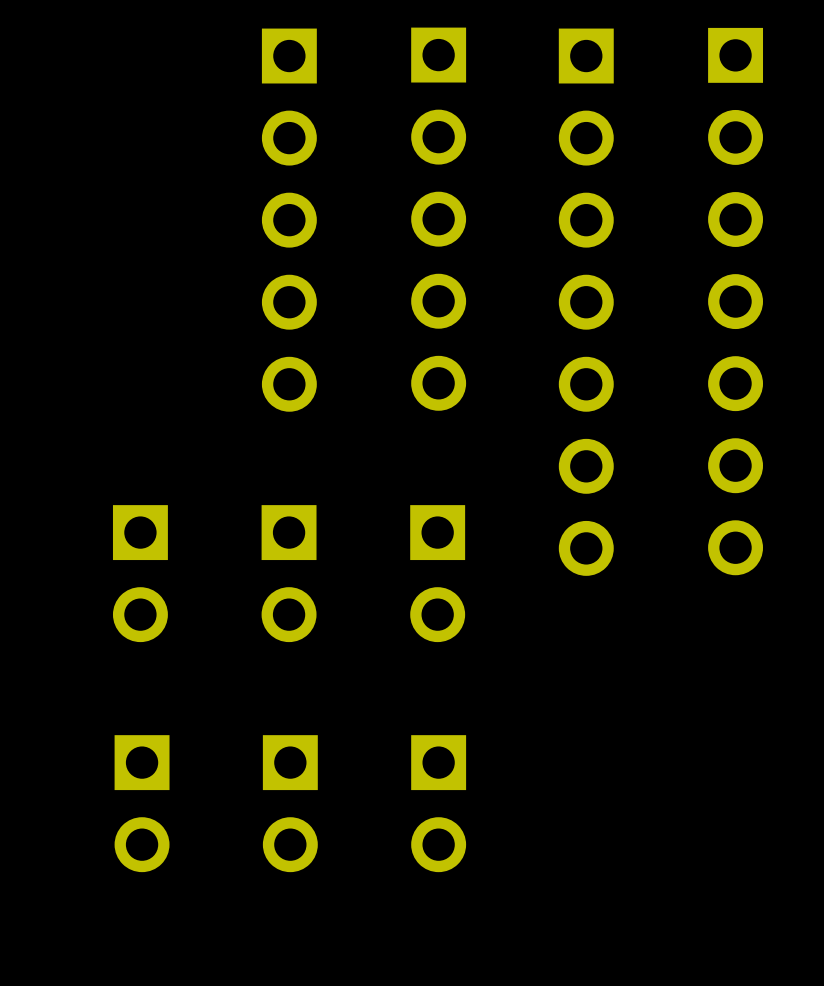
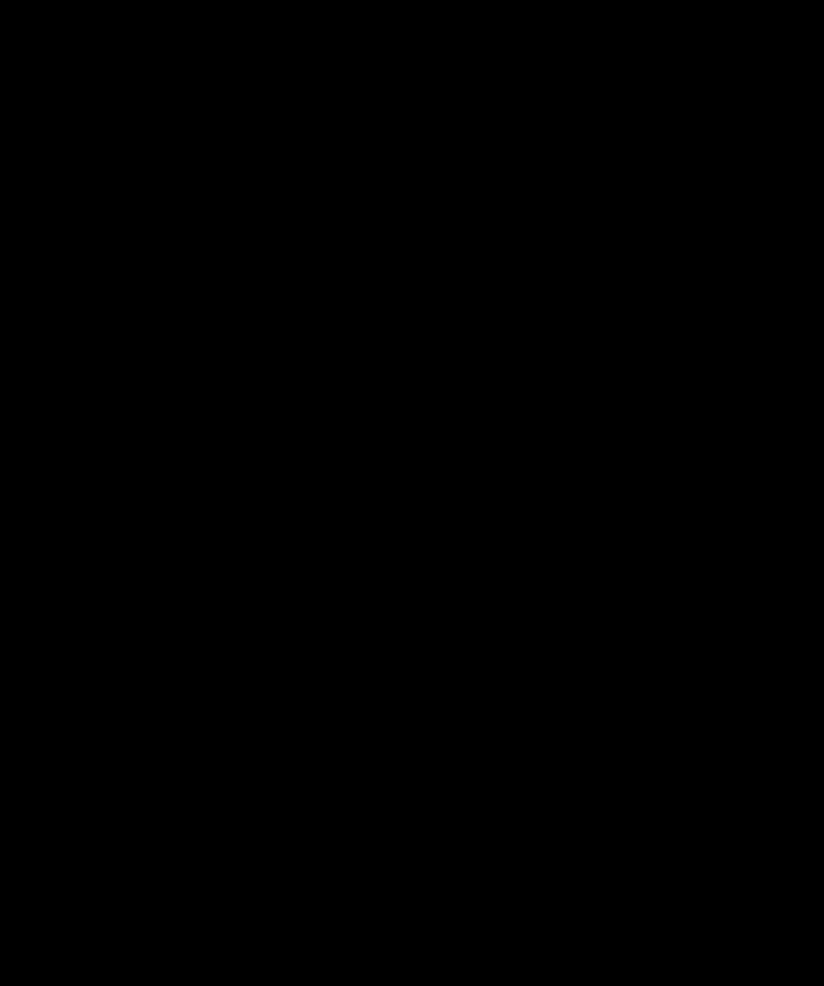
part: (438, 219) -> none
part: (289, 220) -> none
part: (735, 301) -> none
part: (586, 302) -> none
part: (140, 573) -> none
part: (289, 573) -> none
part: (437, 573) -> none
part: (142, 803) -> none
part: (290, 803) -> none
part: (438, 803) -> none

